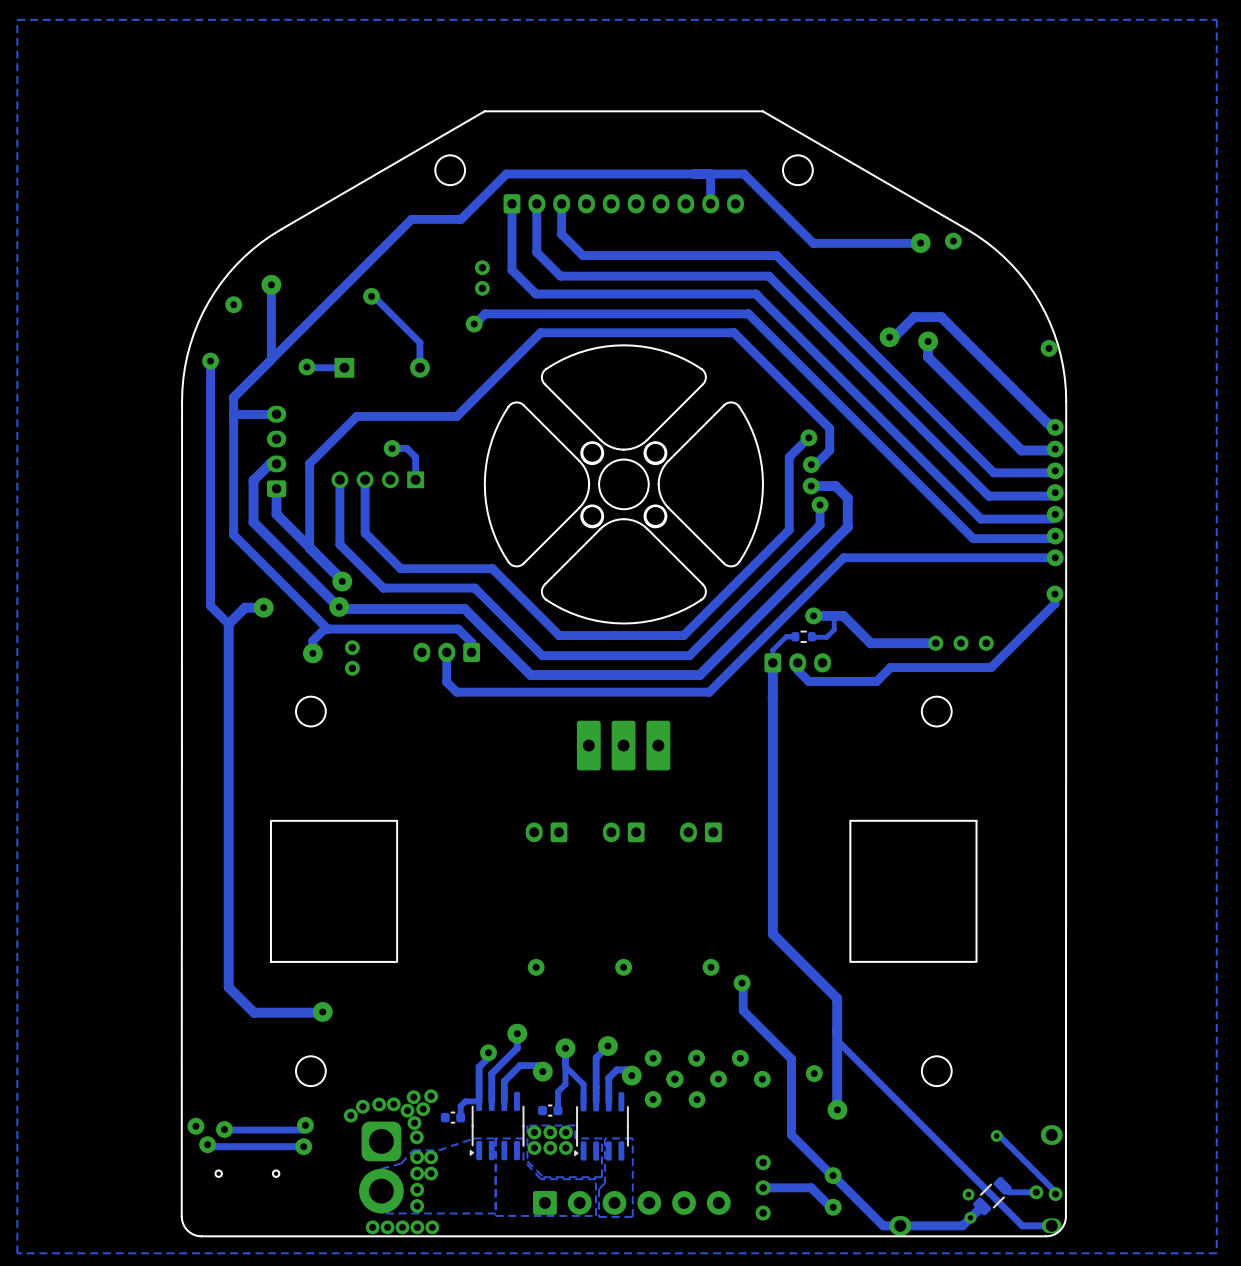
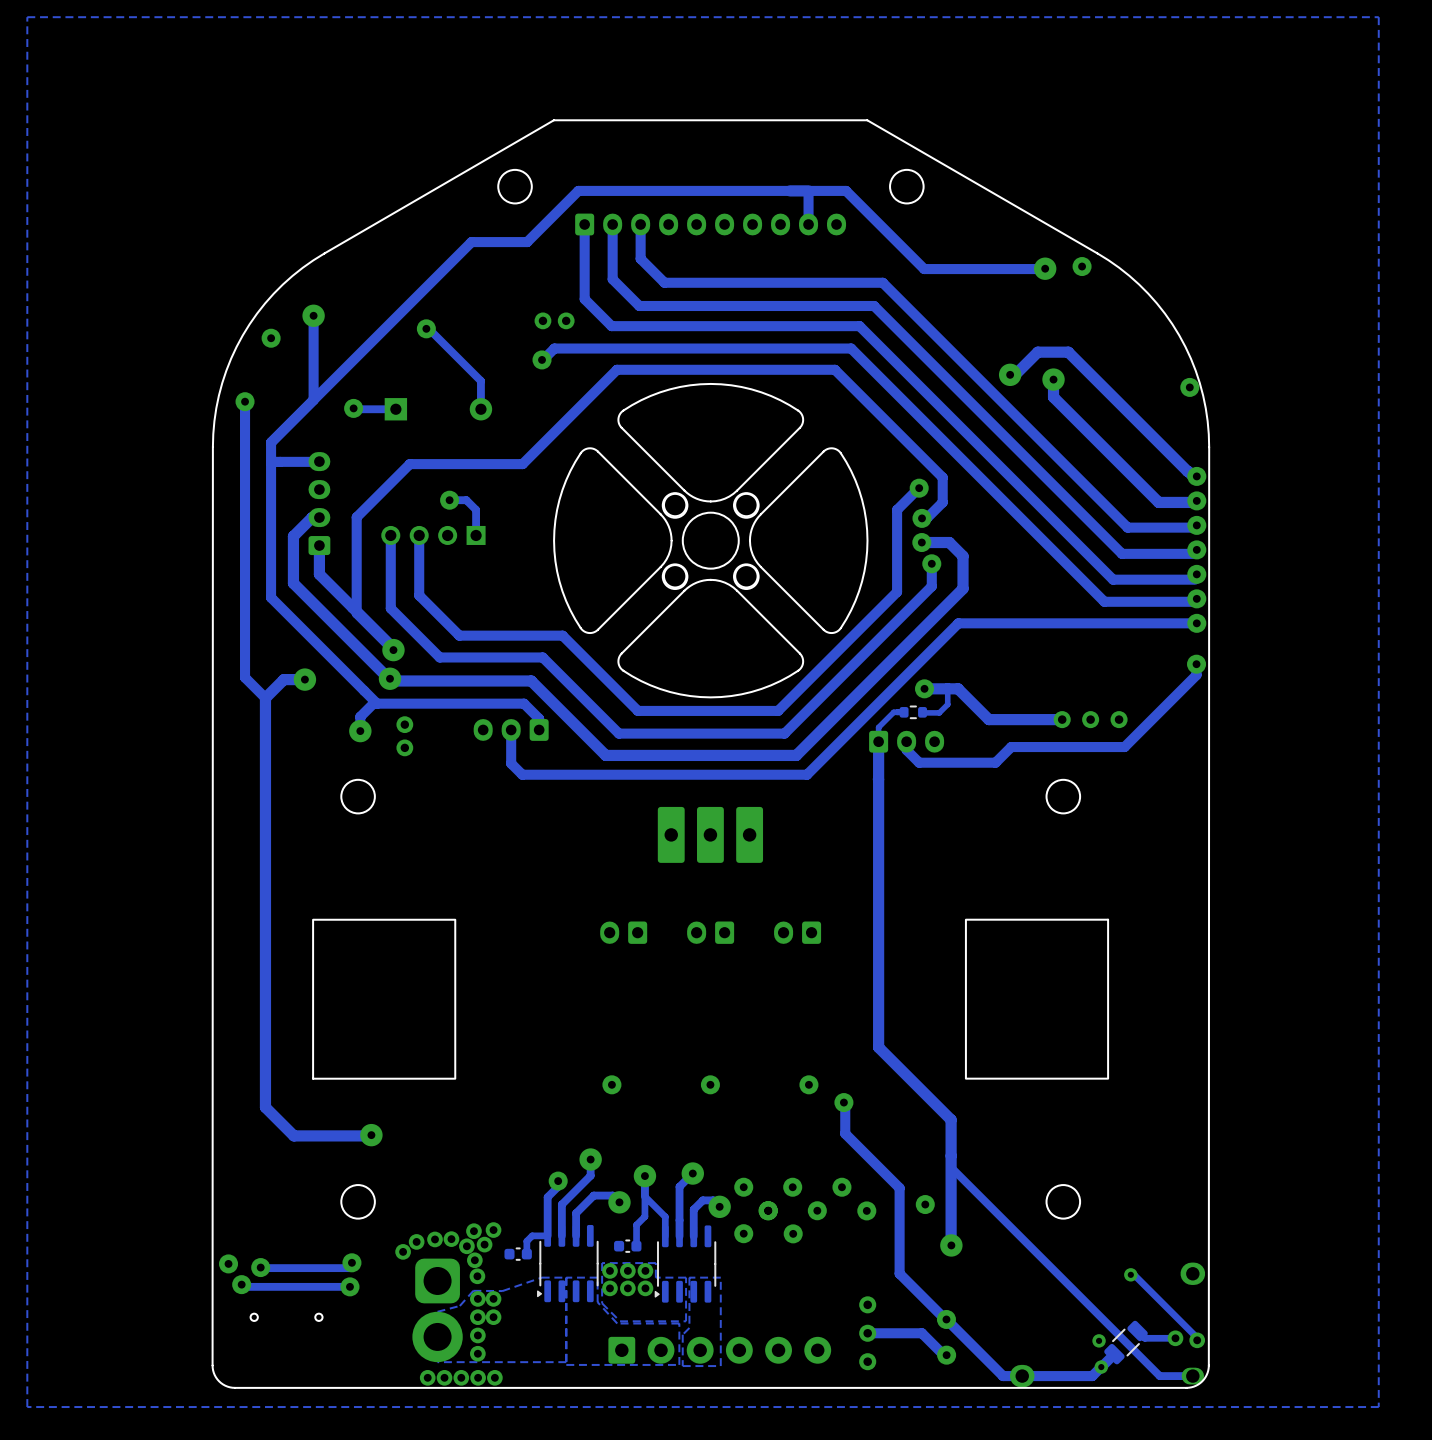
part: (482, 267) -> none
part: (482, 288) -> none
part: none -> (542, 320)
part: none -> (566, 320)

